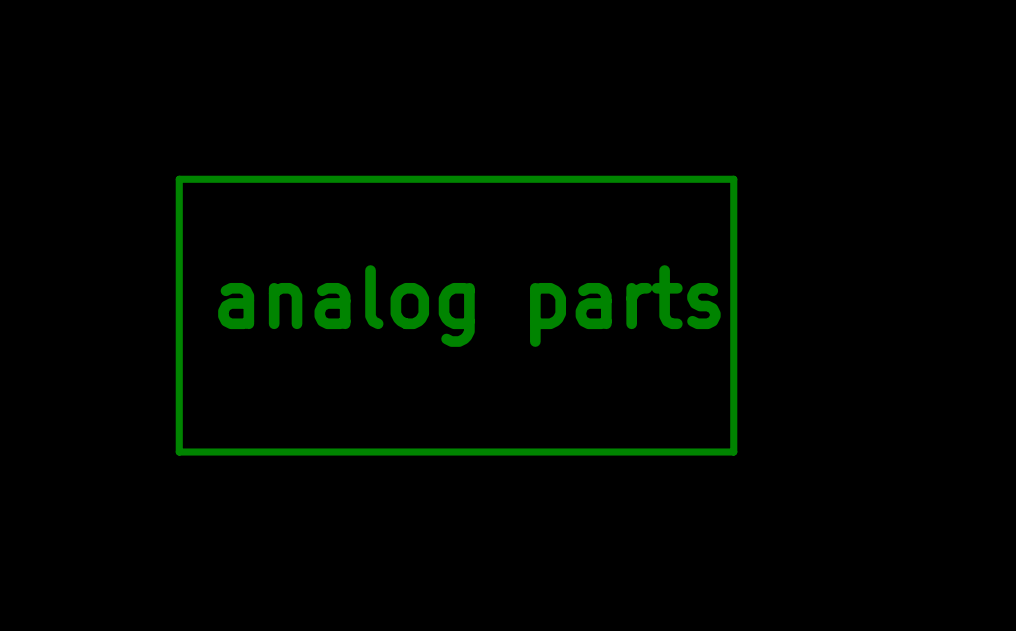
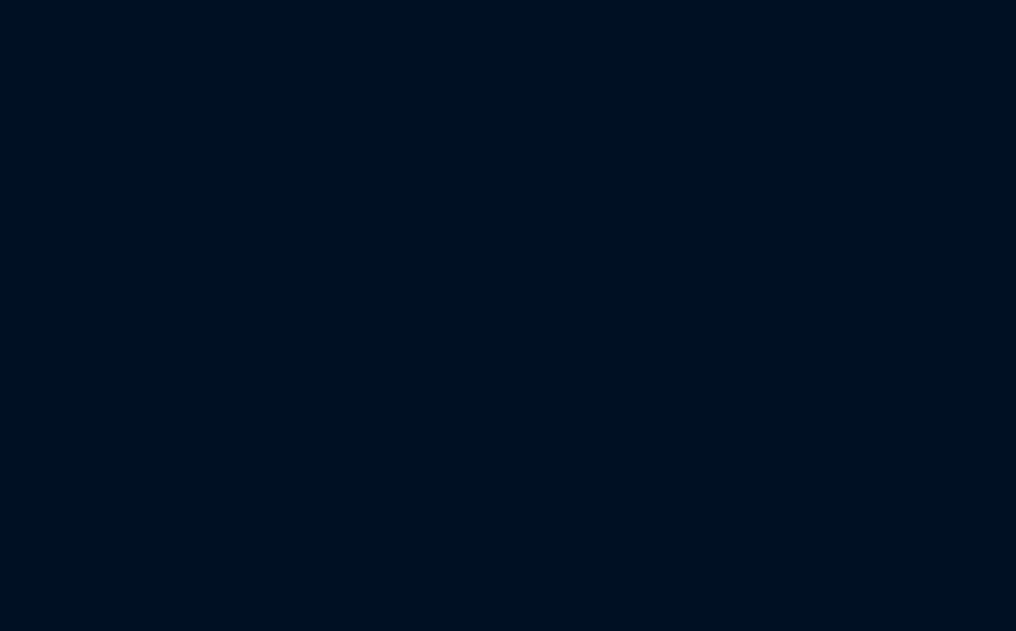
bottom track: (179, 179) (733, 179) (733, 452) (179, 452) (179, 179) -> none
text: analog parts (469, 306) -> none

